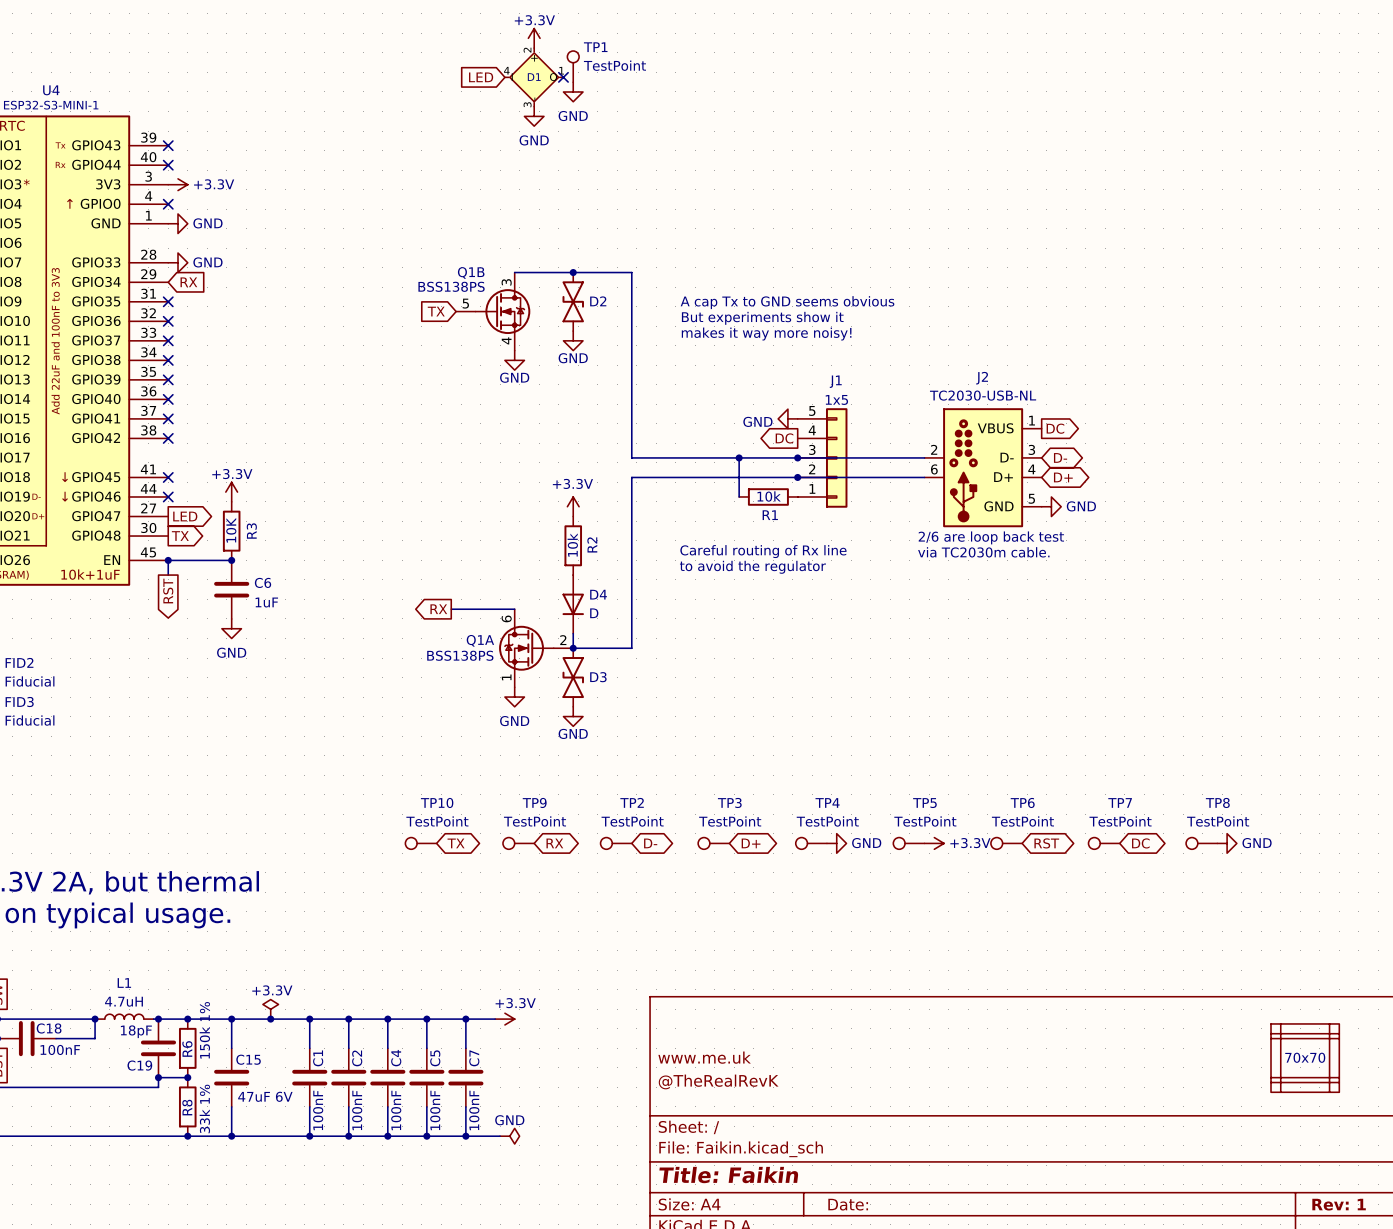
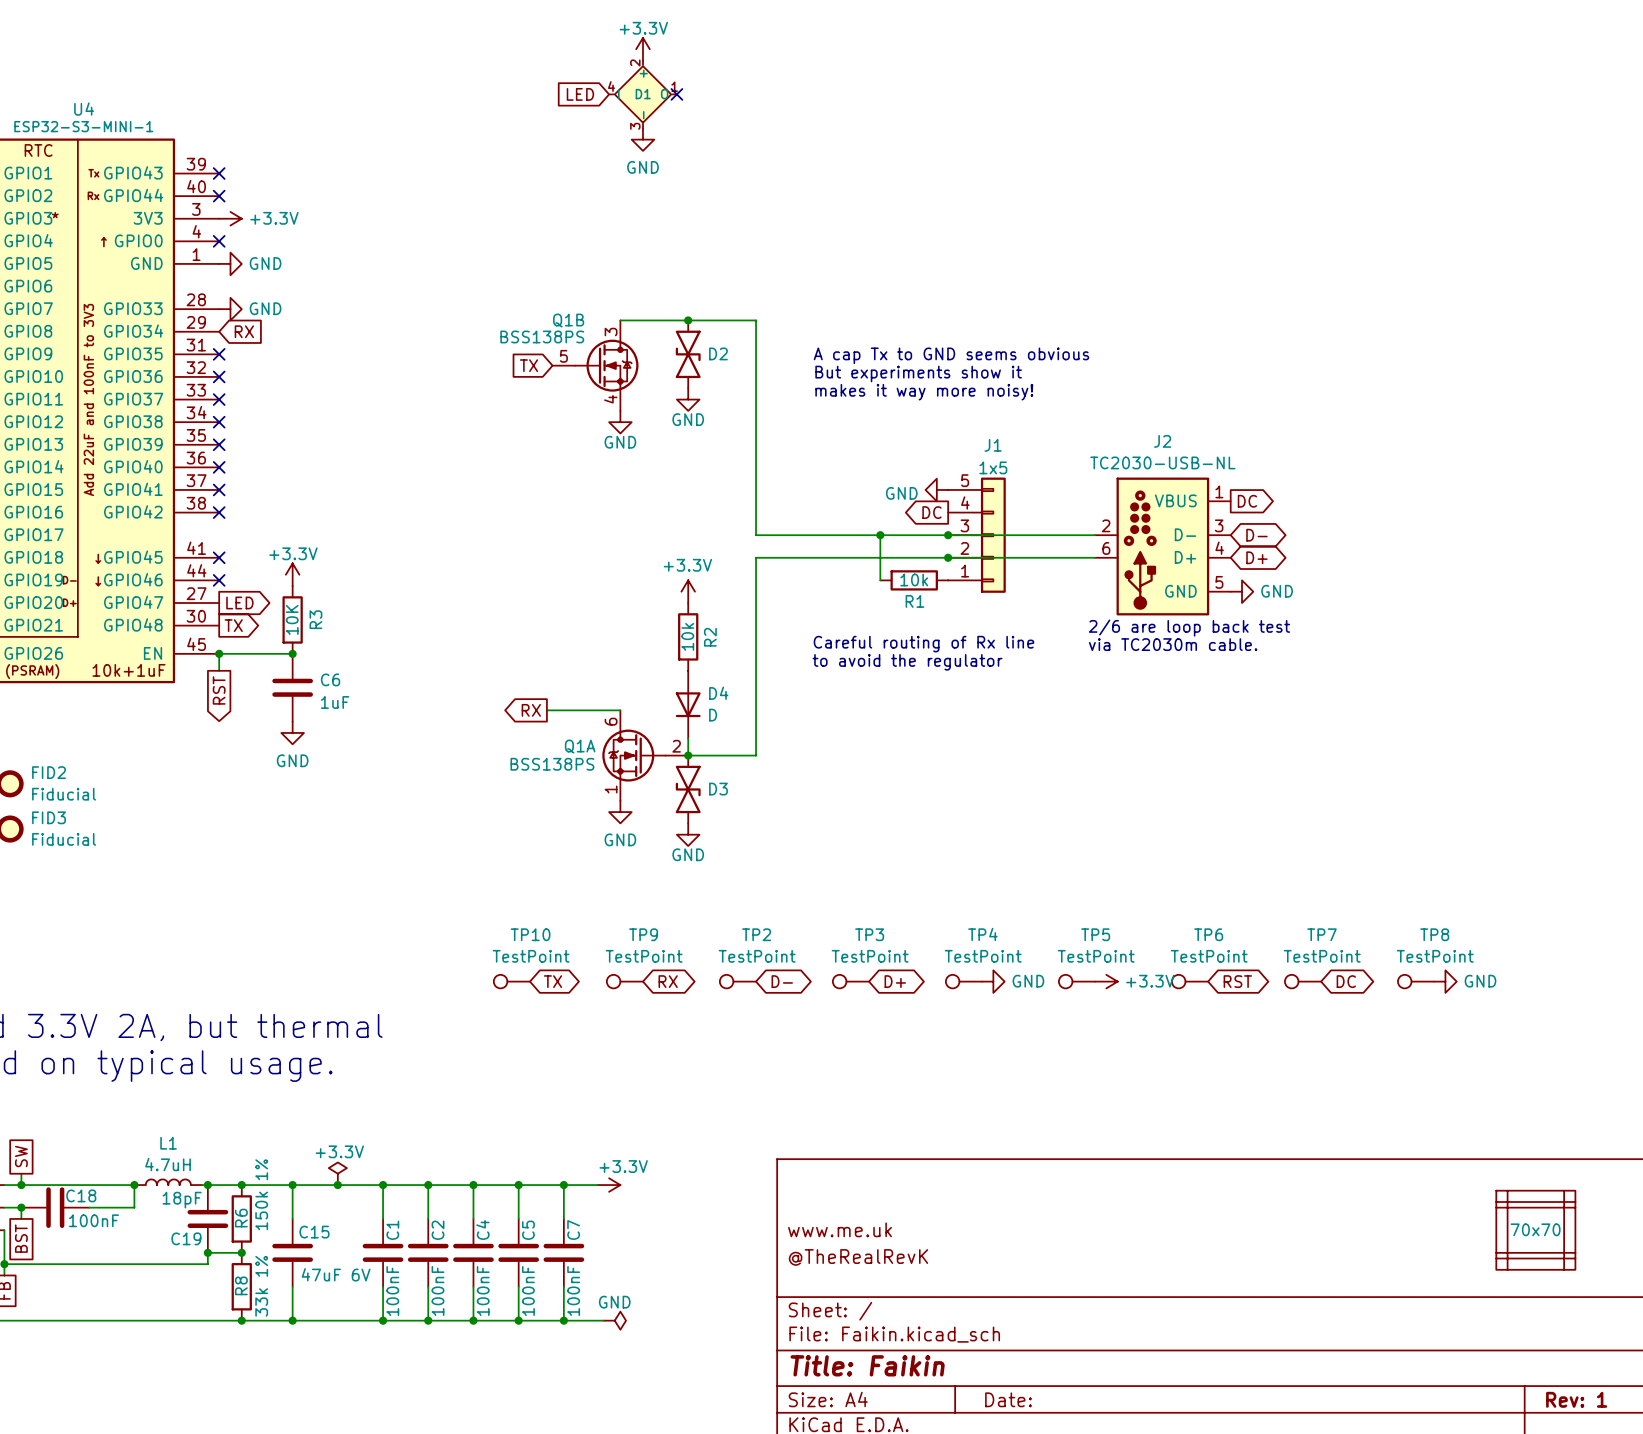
TP1: TestPoint (573, 66) -> none
power symbol: GND (573, 91) -> none

